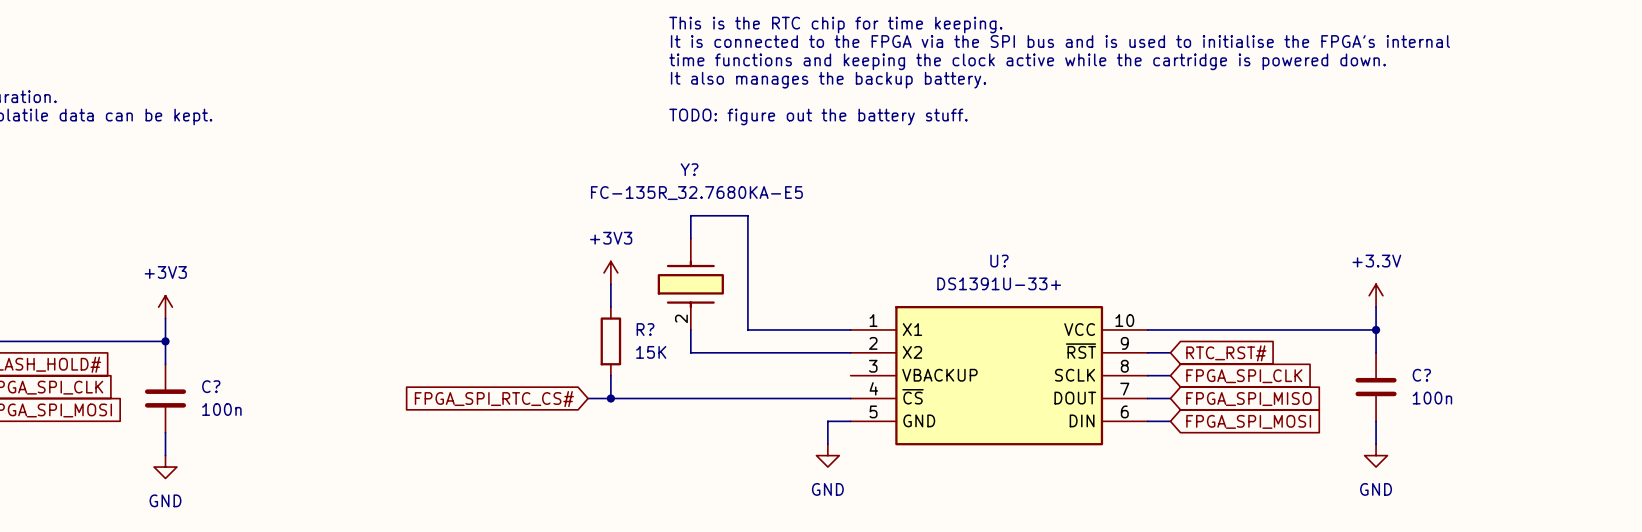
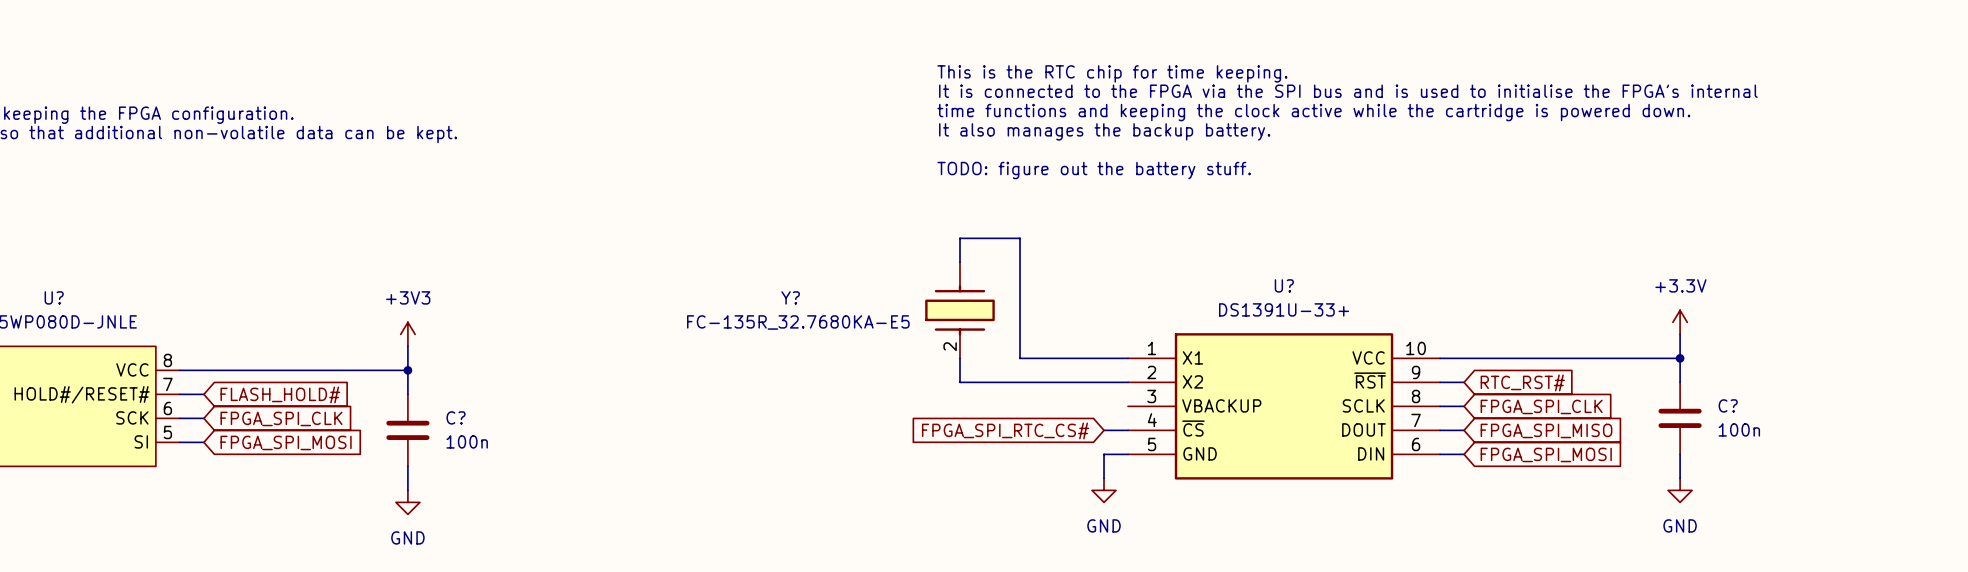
text position: This is the RTC chip for time keeping. (835, 25) -> This is the RTC chip for time keeping. (1112, 73)
text position: It is connected to the FPGA via the SPI bus and is used to initialise the FPGA's internal (1060, 41) -> It is connected to the FPGA via the SPI bus and is used to initialise the FPGA's internal (1348, 91)
text position: time functions and keeping the clock active while the cartridge is powered down. (1027, 61) -> time functions and keeping the clock active while the cartridge is powered down. (1313, 112)
text position: It also manages the backup battery. (828, 80) -> It also manages the backup battery. (1104, 131)
text position: TODO: figure out the battery stuff. (818, 116) -> TODO: figure out the battery stuff. (1094, 170)
Y? name position: Y? (689, 169) -> Y? (790, 297)
Y? value position: FC-135R_32.7680KA-E5 (696, 193) -> FC-135R_32.7680KA-E5 (798, 322)
power symbol: +3V3 (610, 272) -> none
wire: (610, 284) (610, 307) -> none
R?: 15K (610, 341) -> none
wire: (610, 375) (610, 398) -> none
wire: (588, 398) (827, 398) -> none
junction: (610, 398) -> none
global label: FPGA_SPI_RTC_CS# (494, 399) -> none
global label: none -> FPGA_SPI_RTC_CS# (1005, 430)

